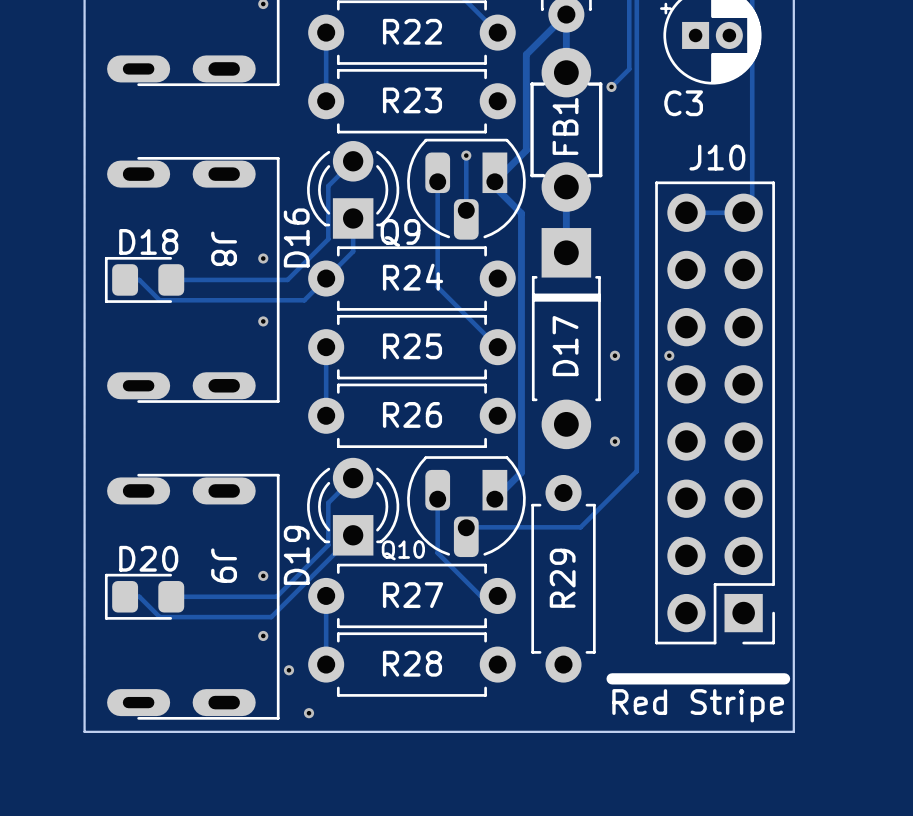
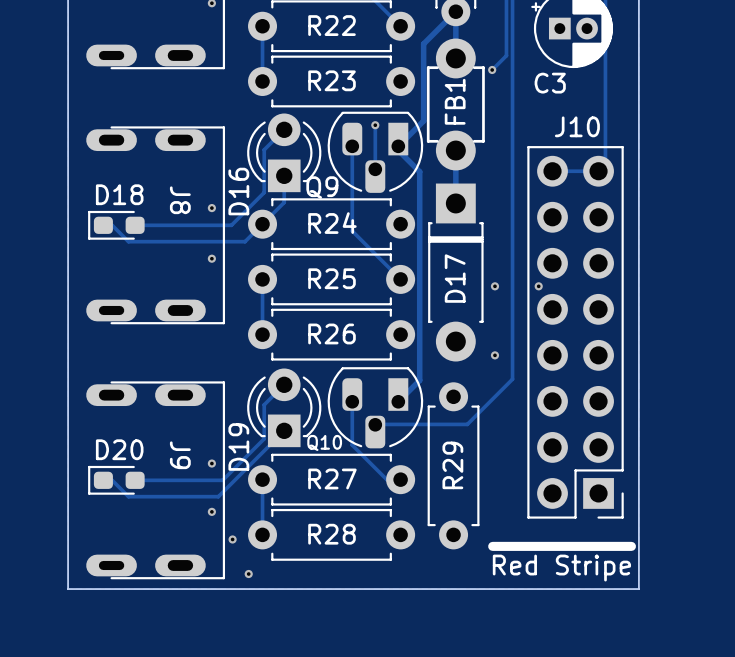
D18 footprint: [104, 256, 185, 303] -> [88, 210, 145, 240]
D20 footprint: [104, 573, 185, 620] -> [88, 465, 145, 495]

